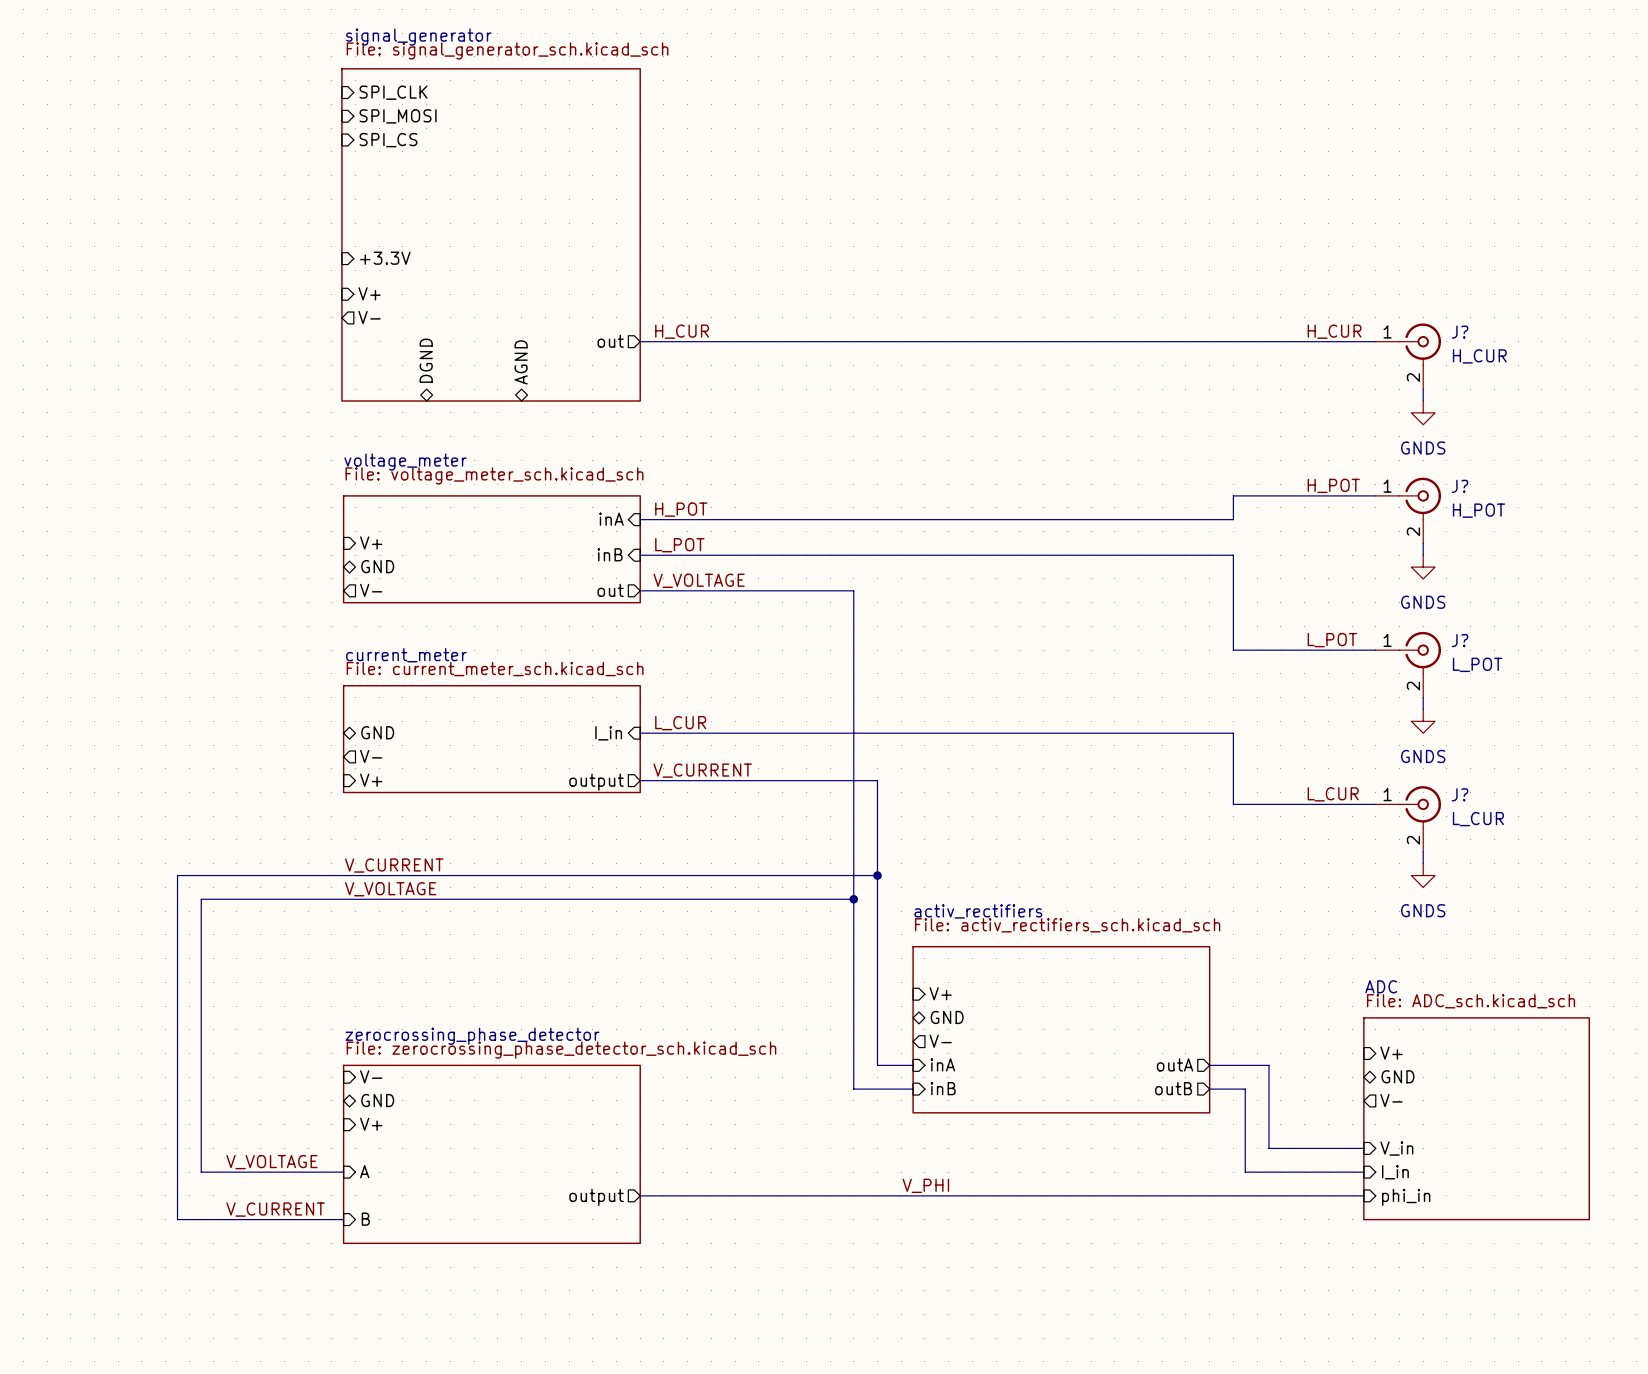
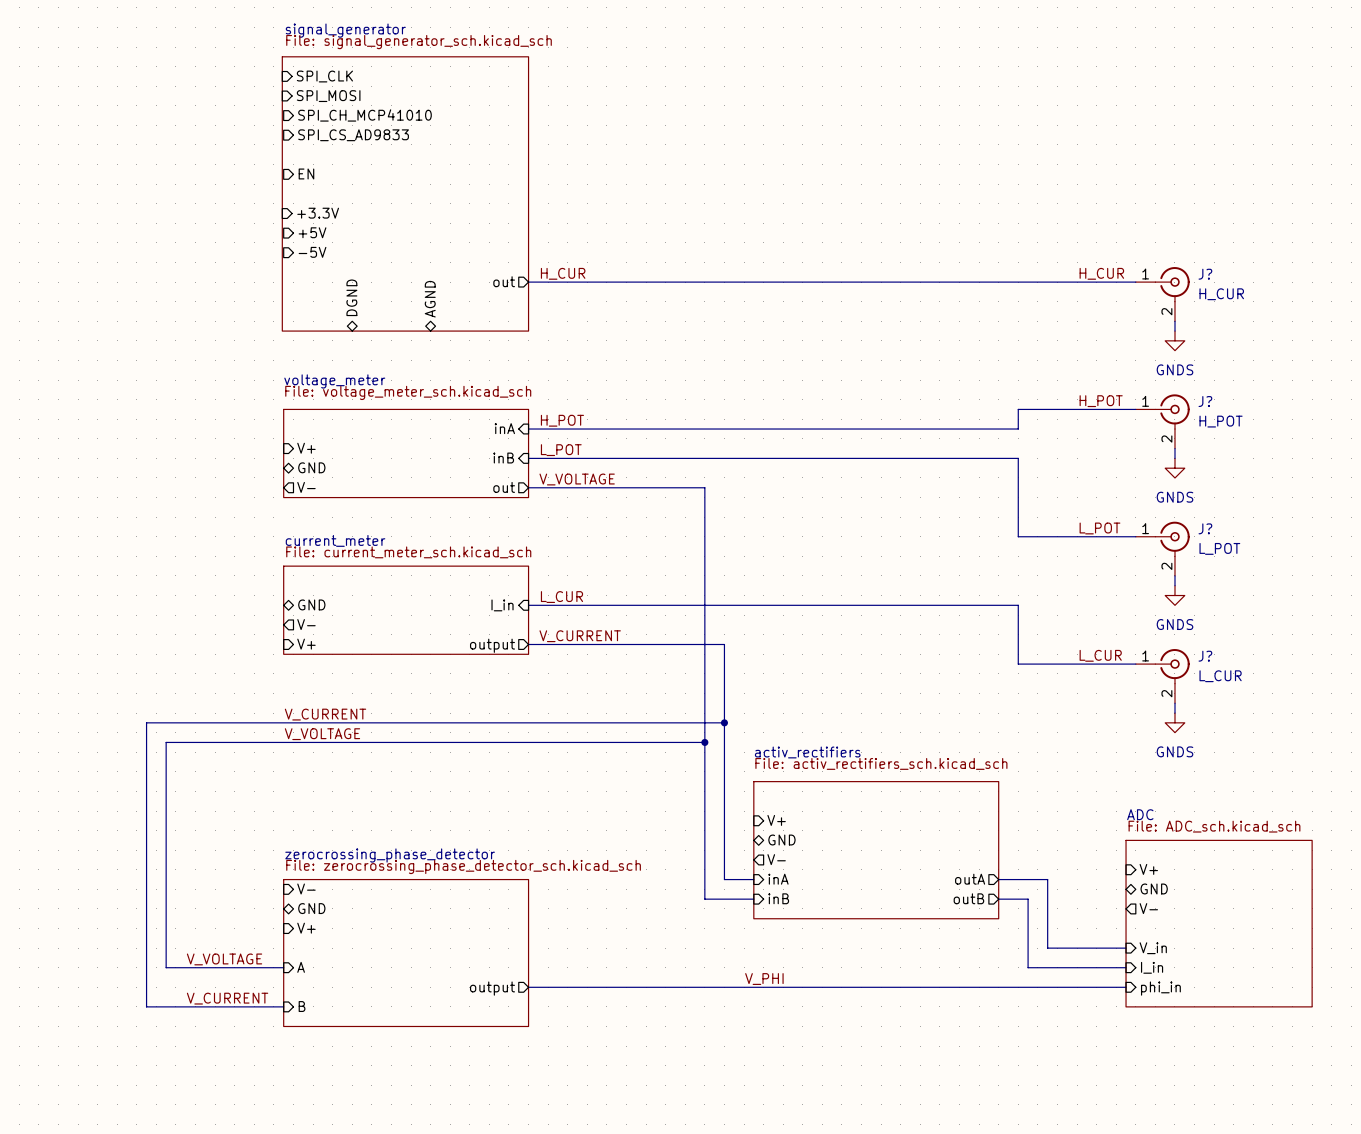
sheet pin: SPI_CS (388, 140) -> SPI_CH_MCP41010 (364, 115)
sheet pin: none -> SPI_CS_AD9833 (353, 135)
sheet pin: none -> EN (306, 173)
sheet pin: none -> +5V (312, 232)
sheet pin: V+ (369, 293) -> none
sheet pin: none -> -5V (312, 252)
sheet pin: V- (369, 317) -> none

